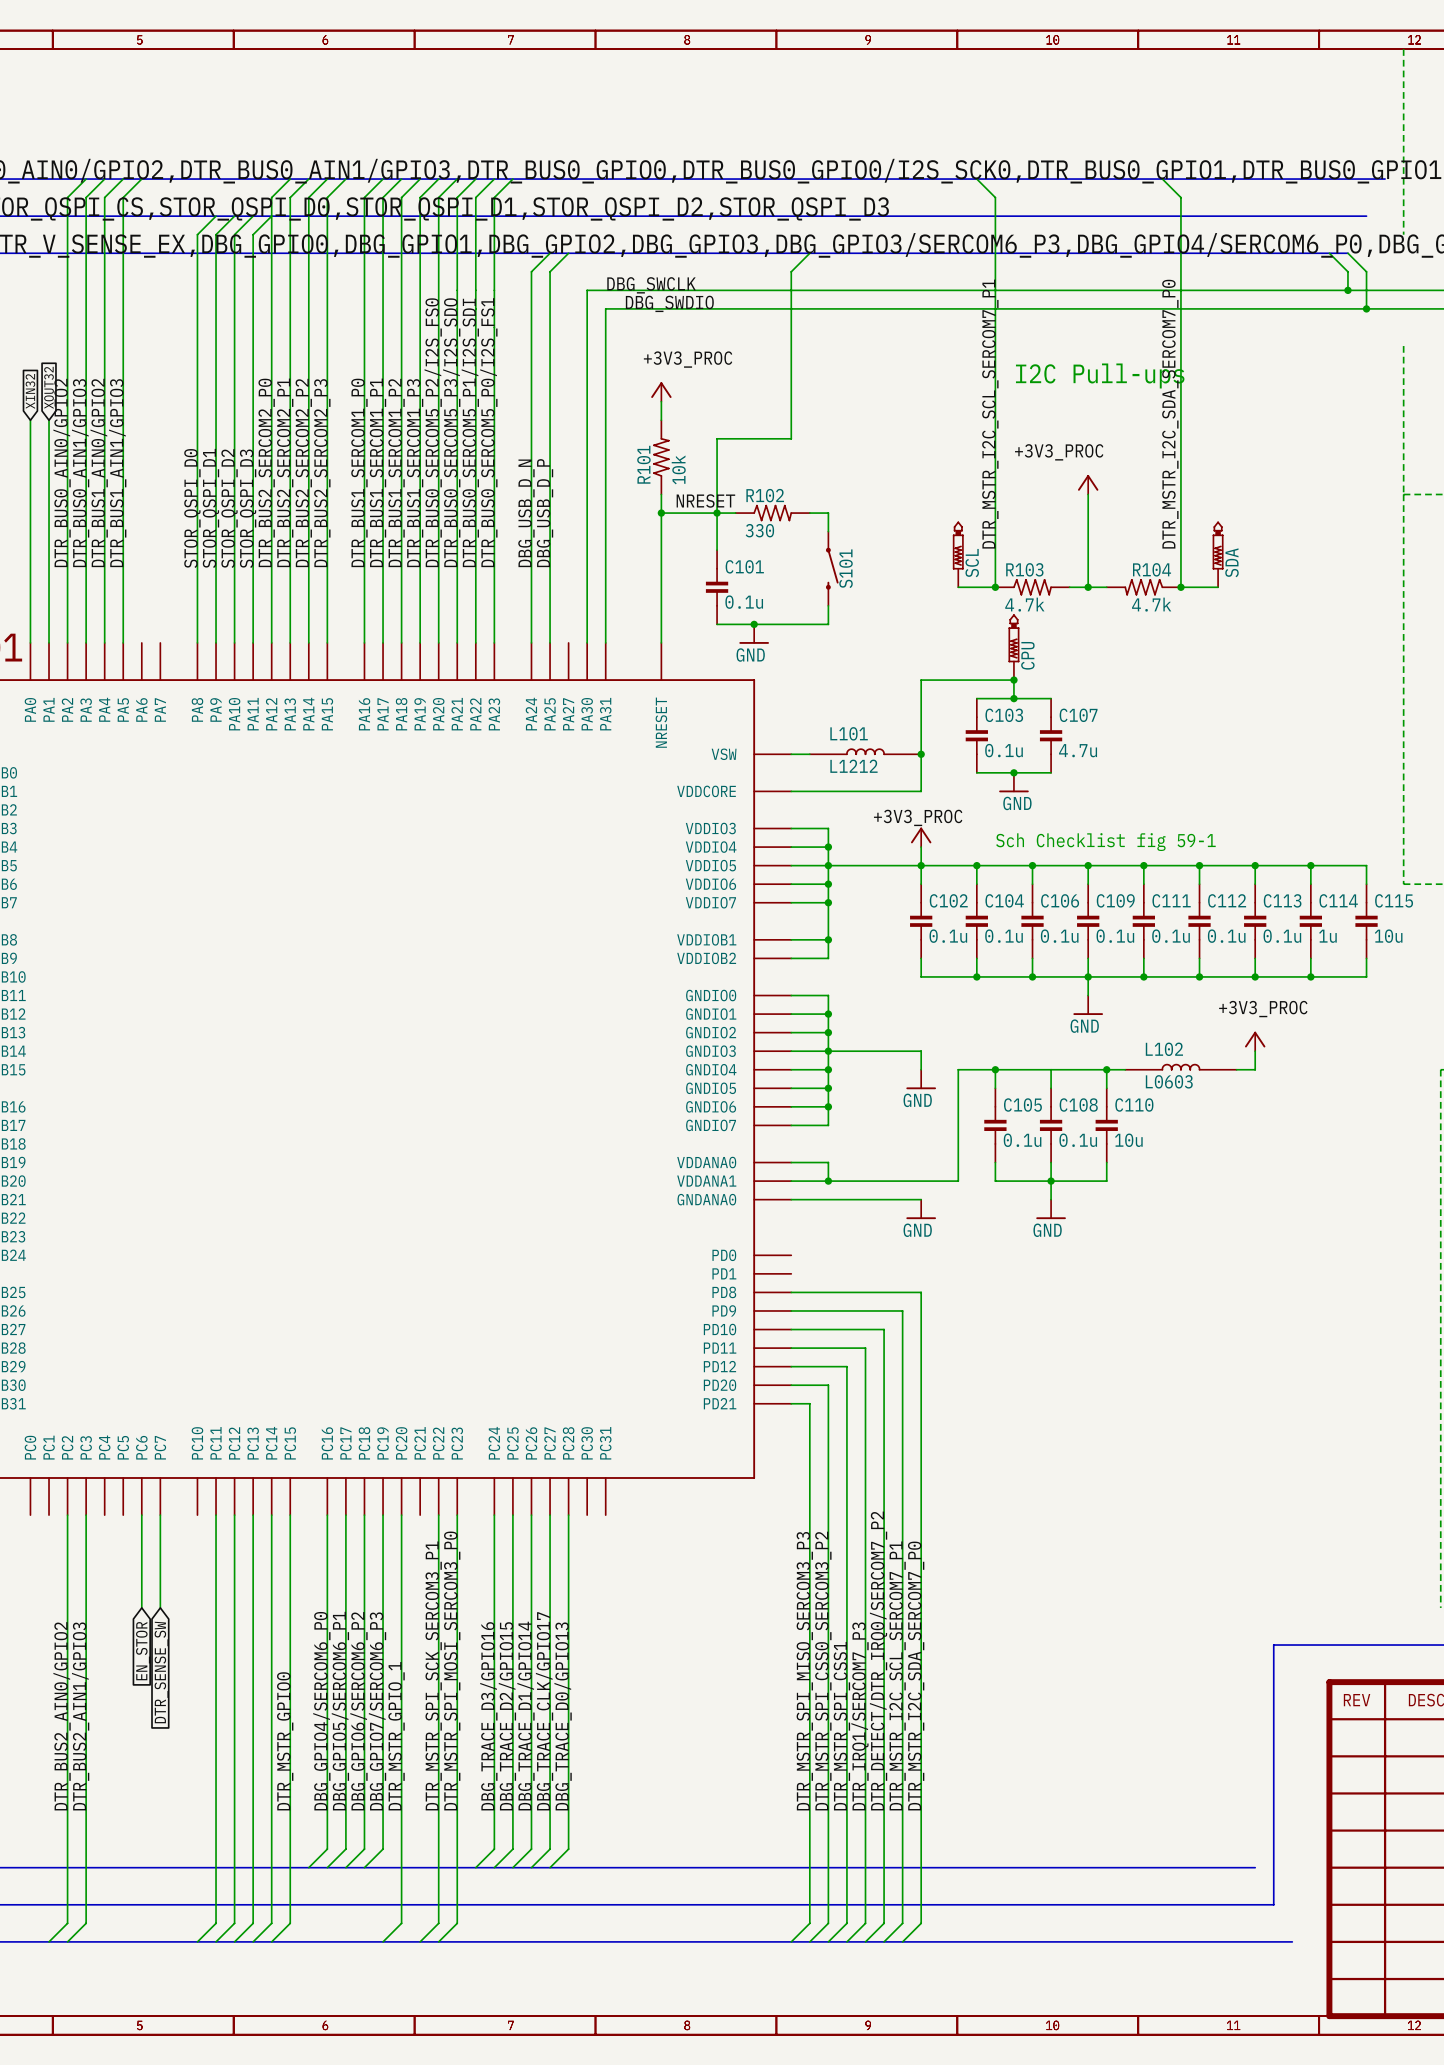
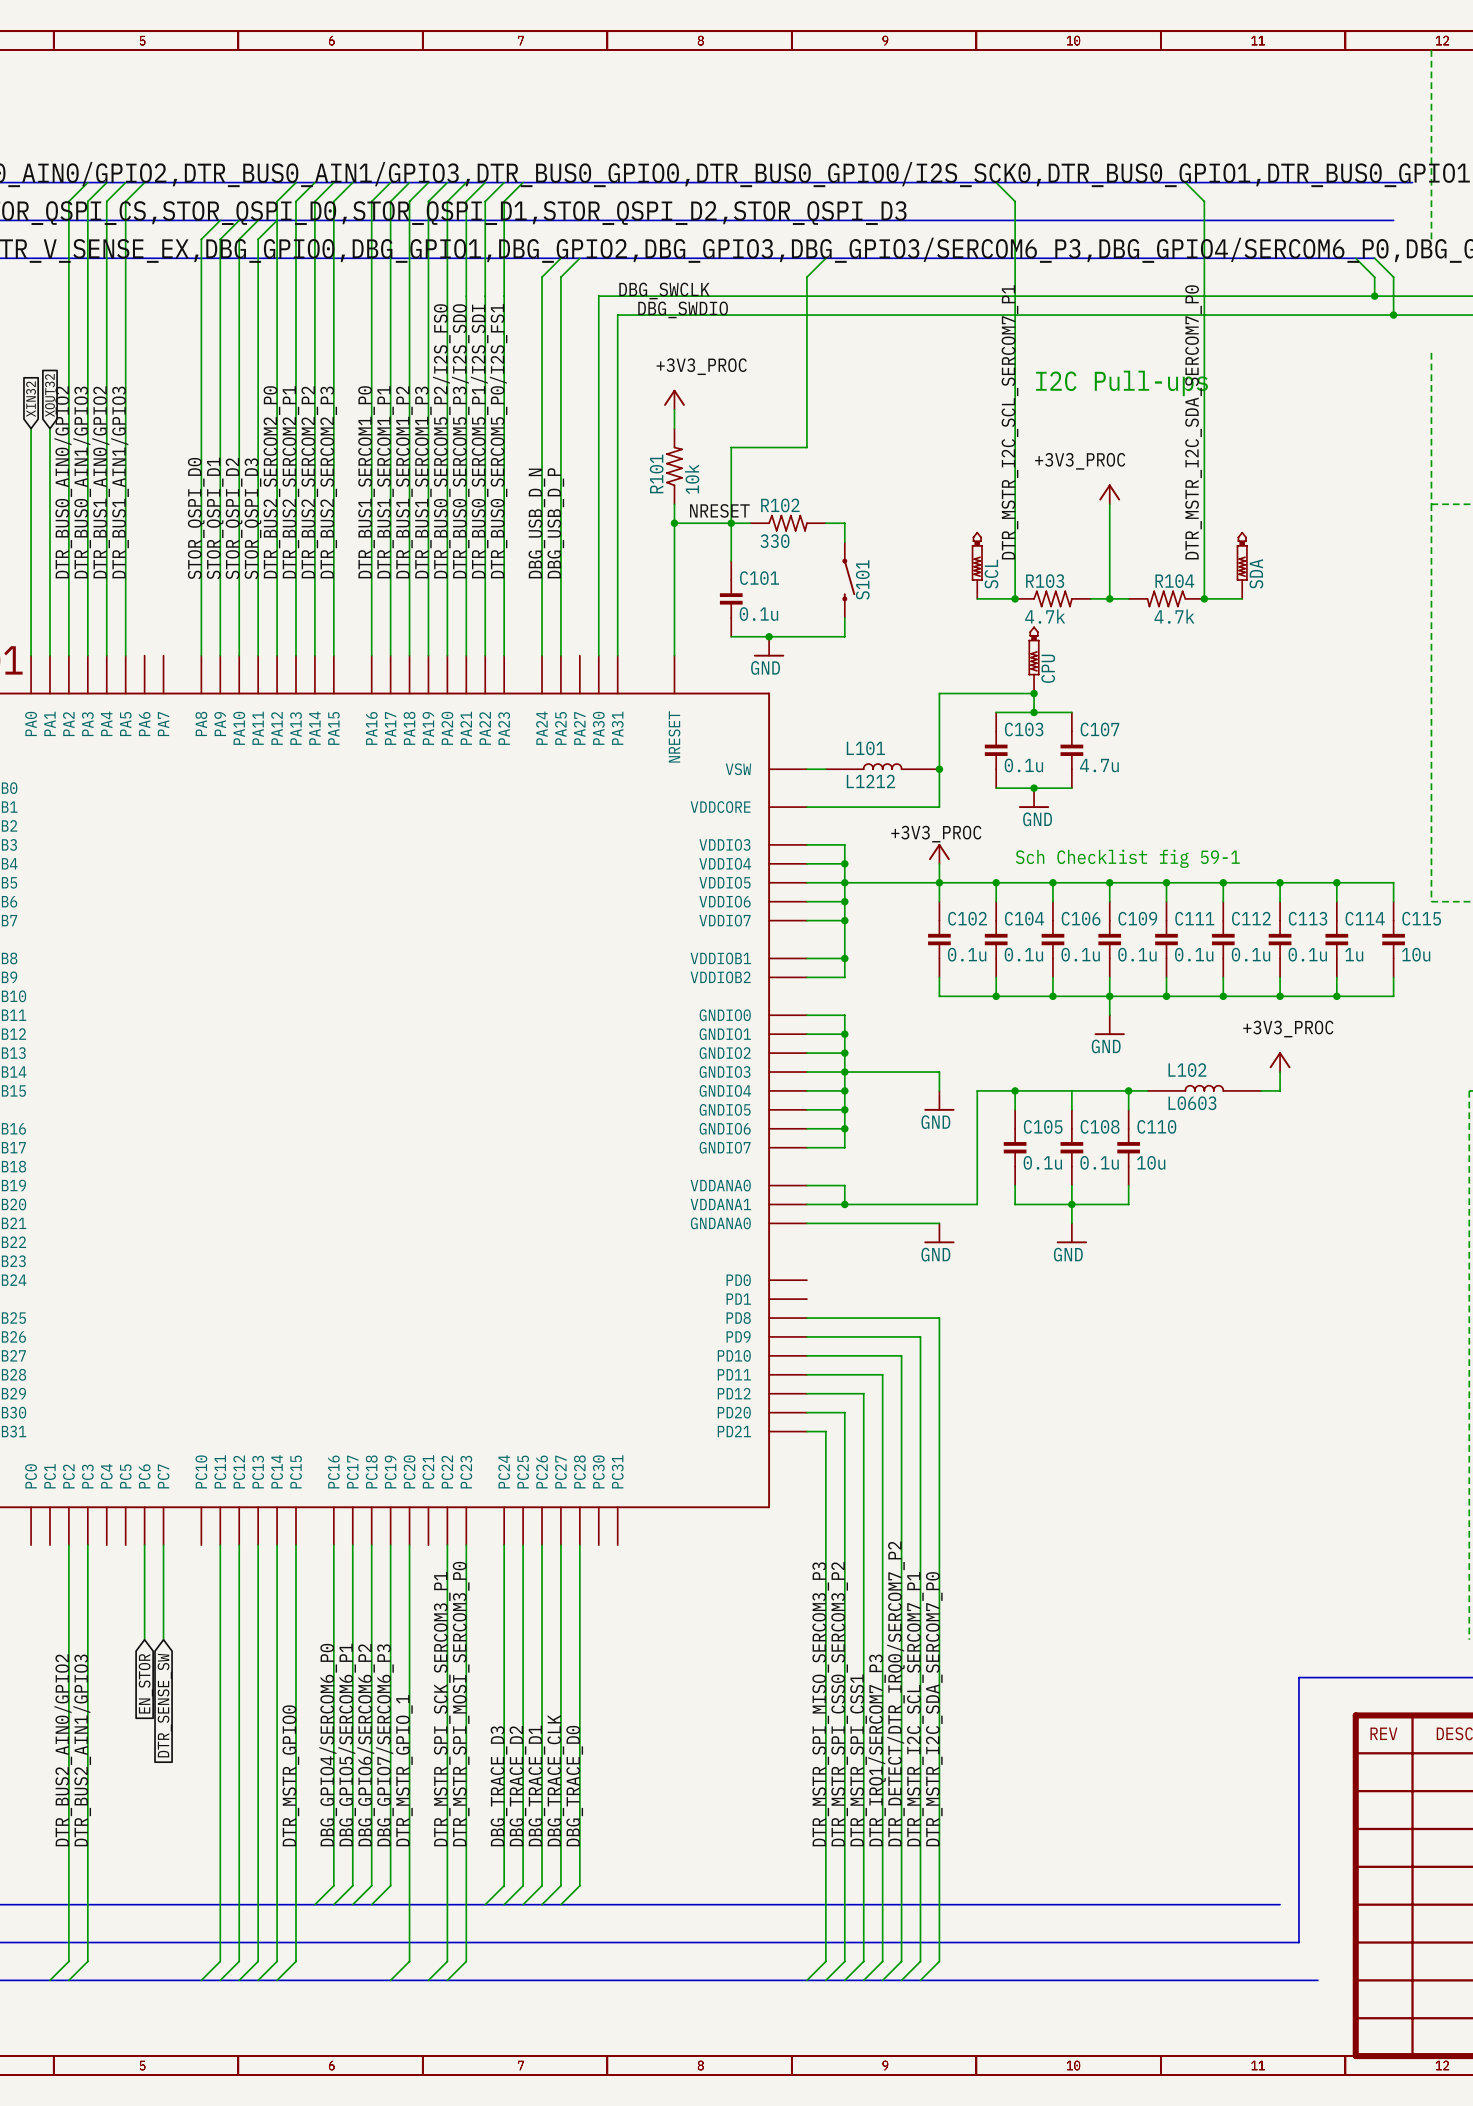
label: DBG_TRACE_CLK/GPIO17 (544, 1711) -> DBG_TRACE_CLK (555, 1780)
label: DBG_TRACE_D3/GPIO16 (488, 1716) -> DBG_TRACE_D3 (499, 1786)
label: DBG_TRACE_D2/GPIO15 (507, 1716) -> DBG_TRACE_D2 (517, 1786)
label: DBG_TRACE_D1/GPIO14 (525, 1716) -> DBG_TRACE_D1 (536, 1786)
label: DBG_TRACE_D0/GPIO13 (563, 1716) -> DBG_TRACE_D0 (574, 1786)

